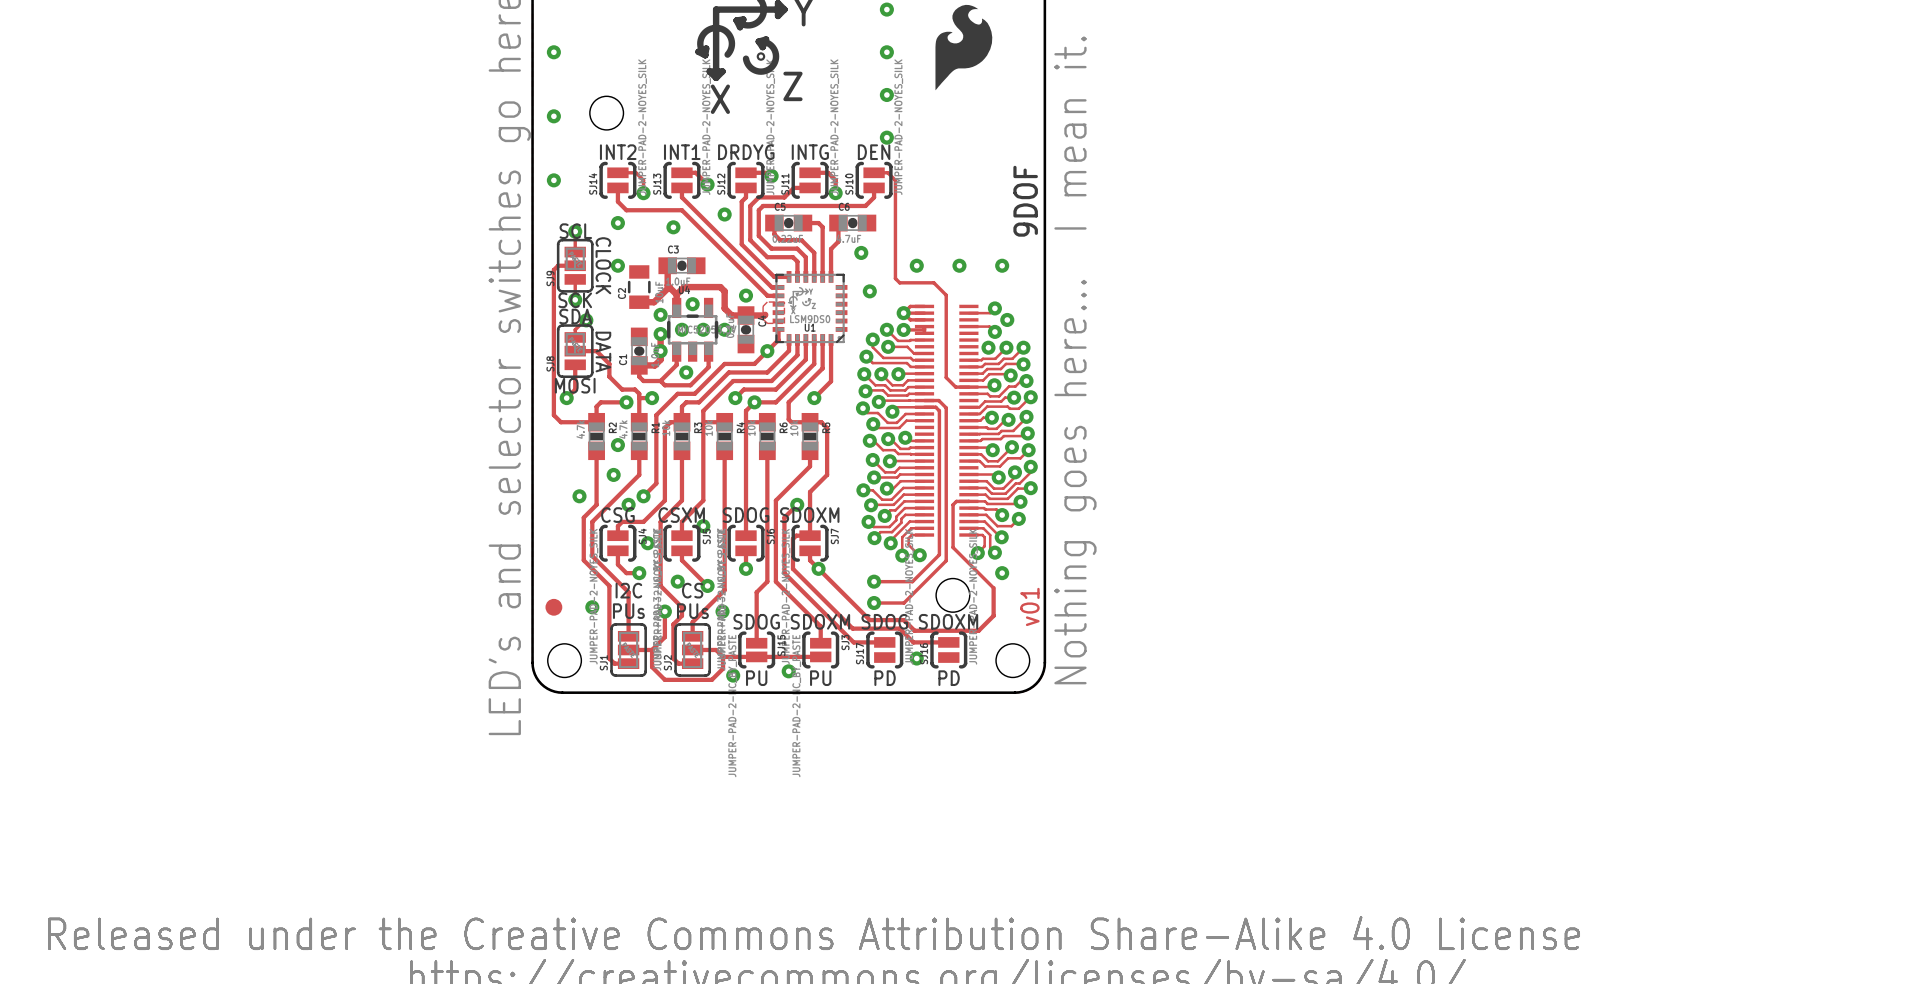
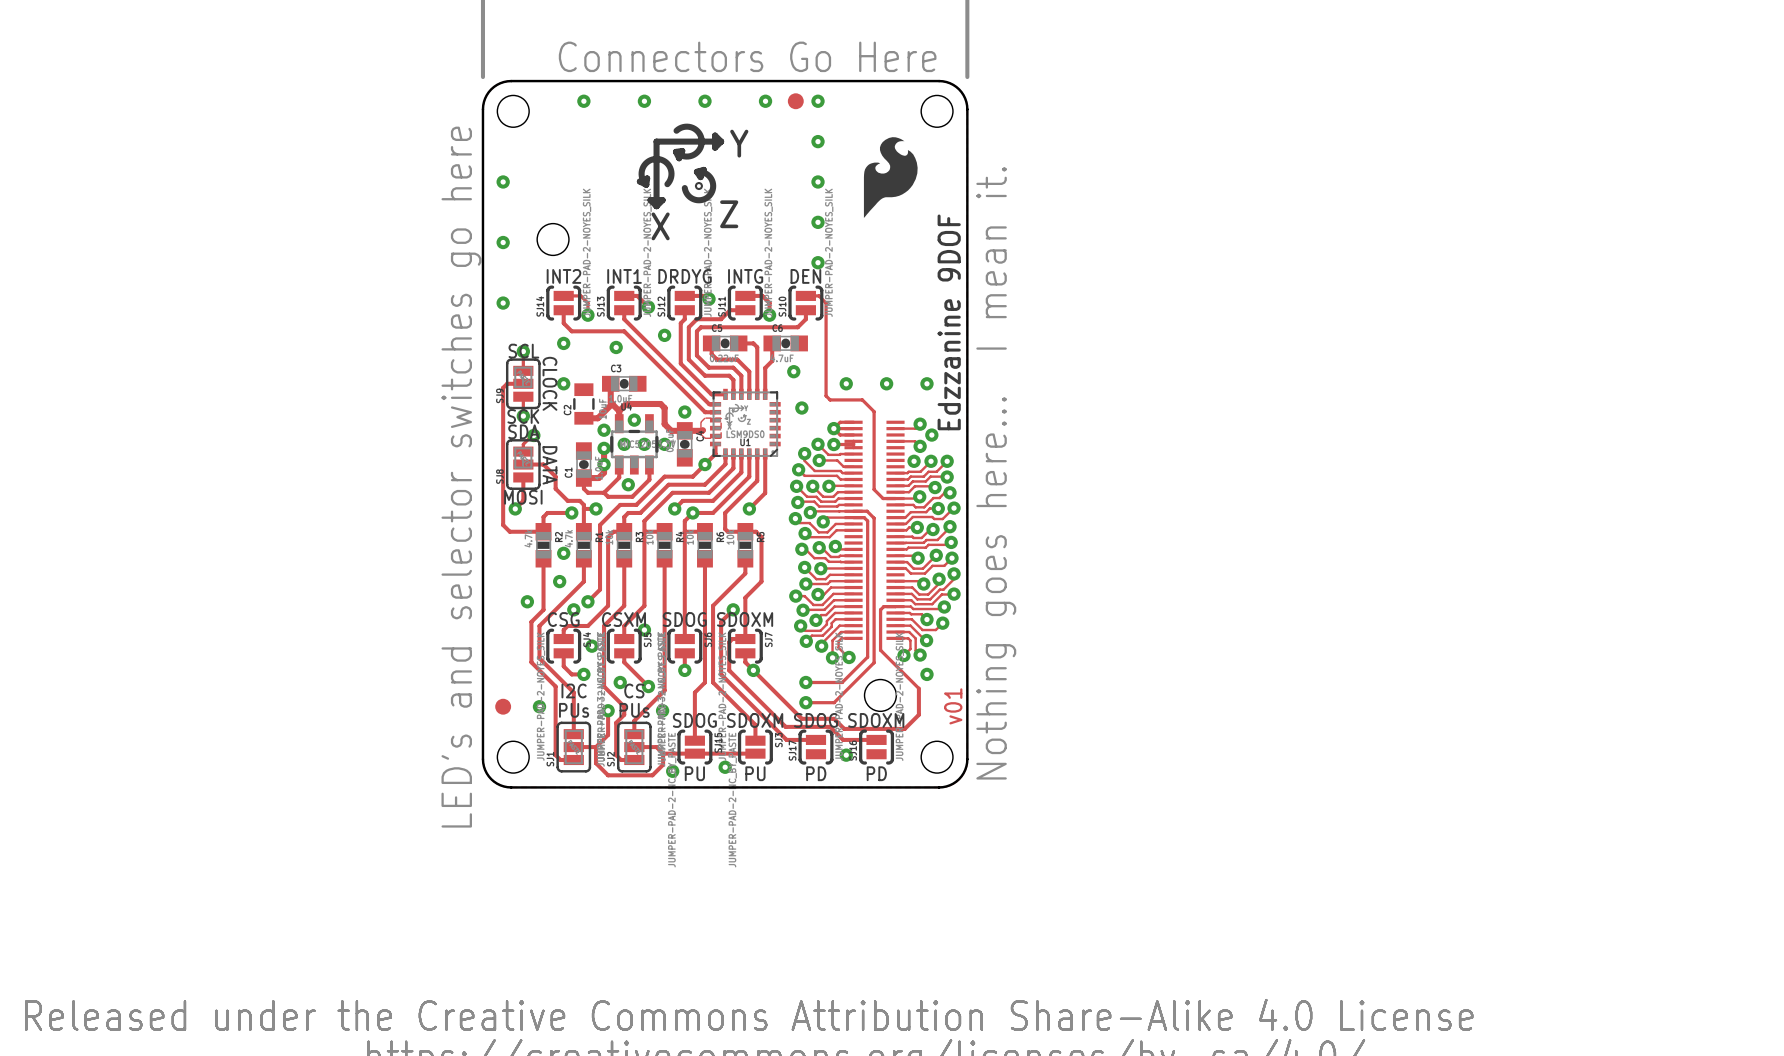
text: 9DOF (1025, 201) -> Edzzanine 9DOF (949, 322)

